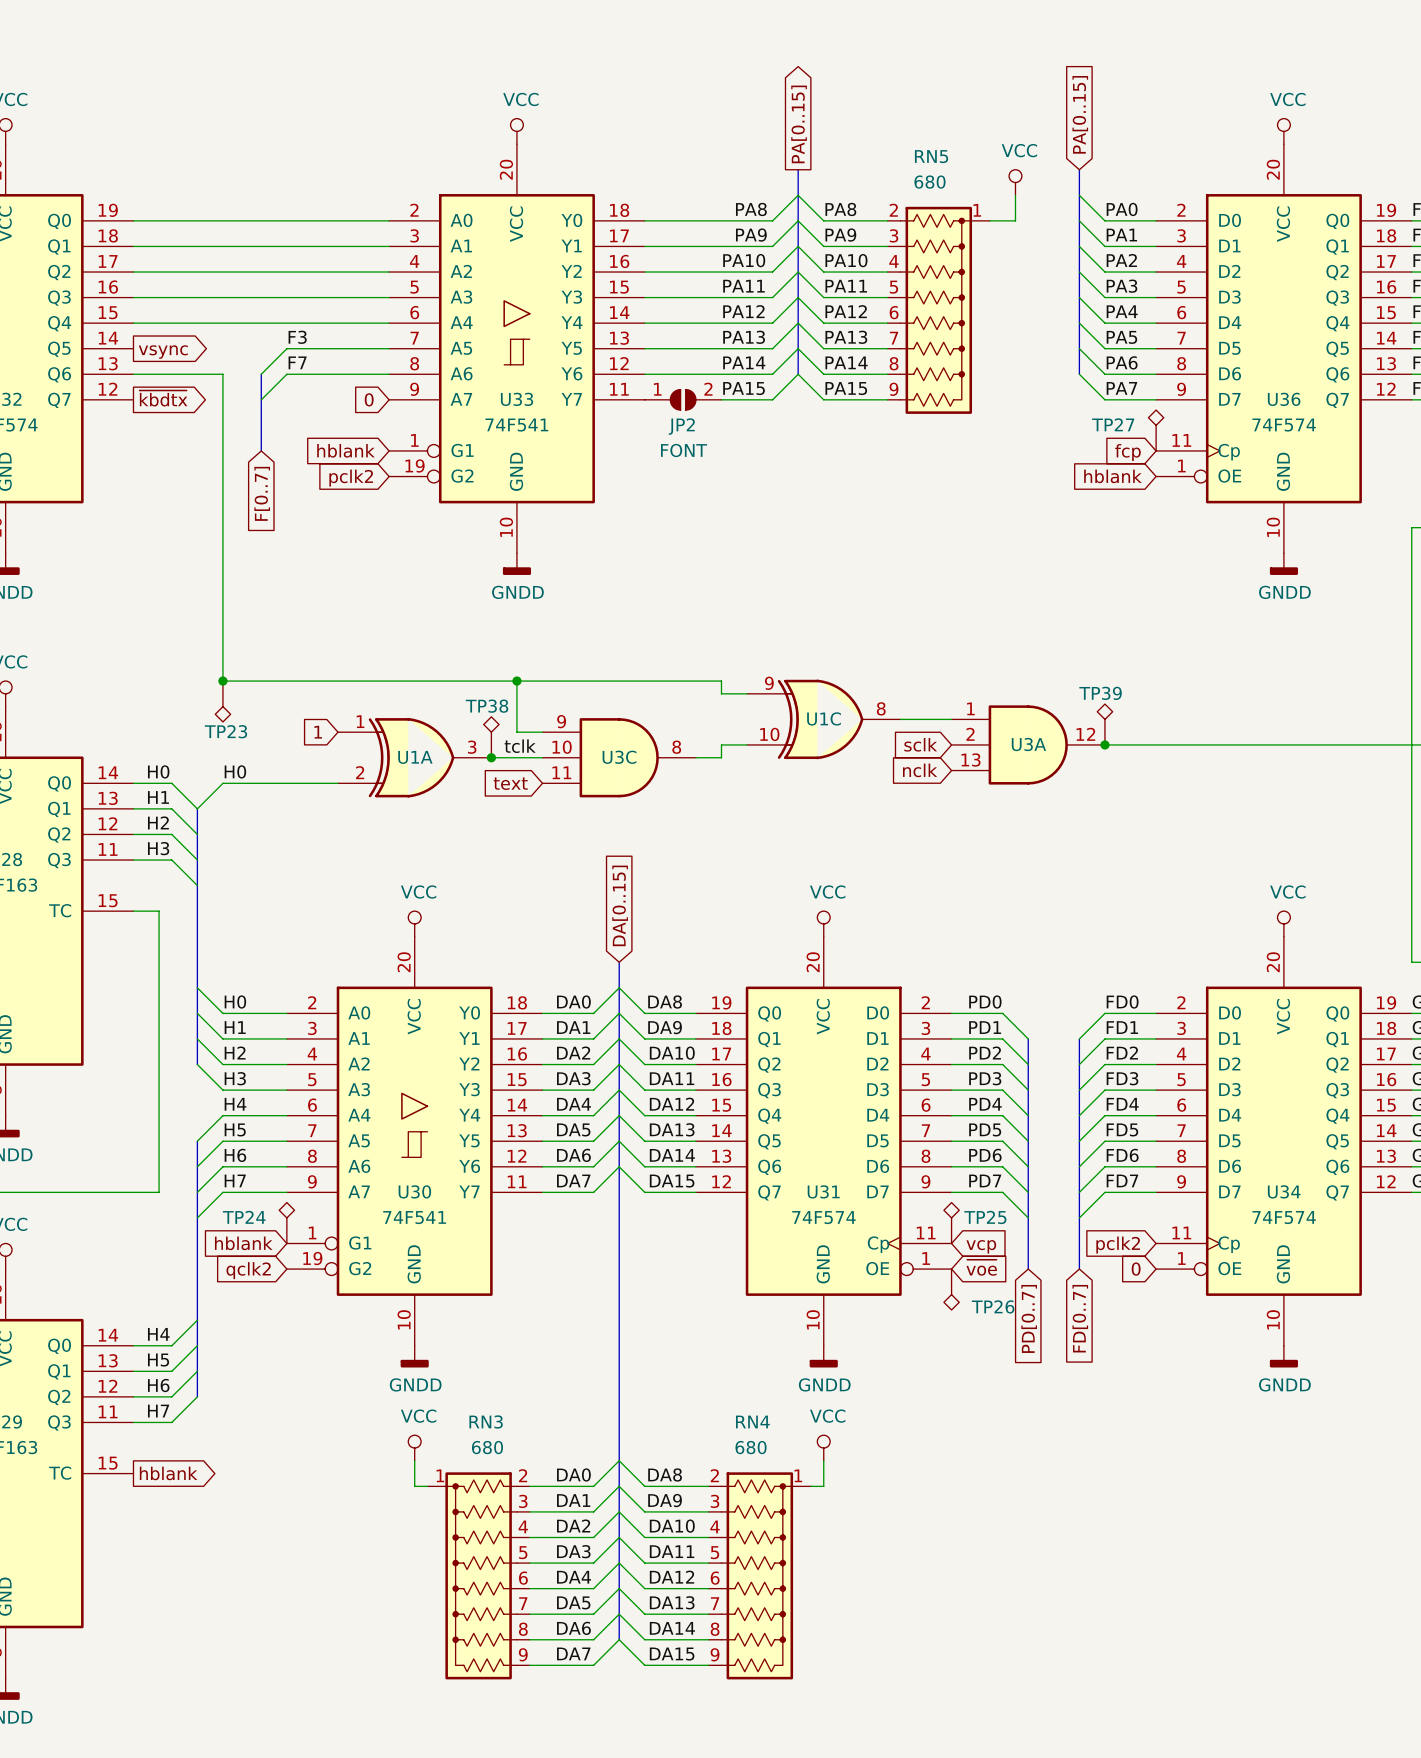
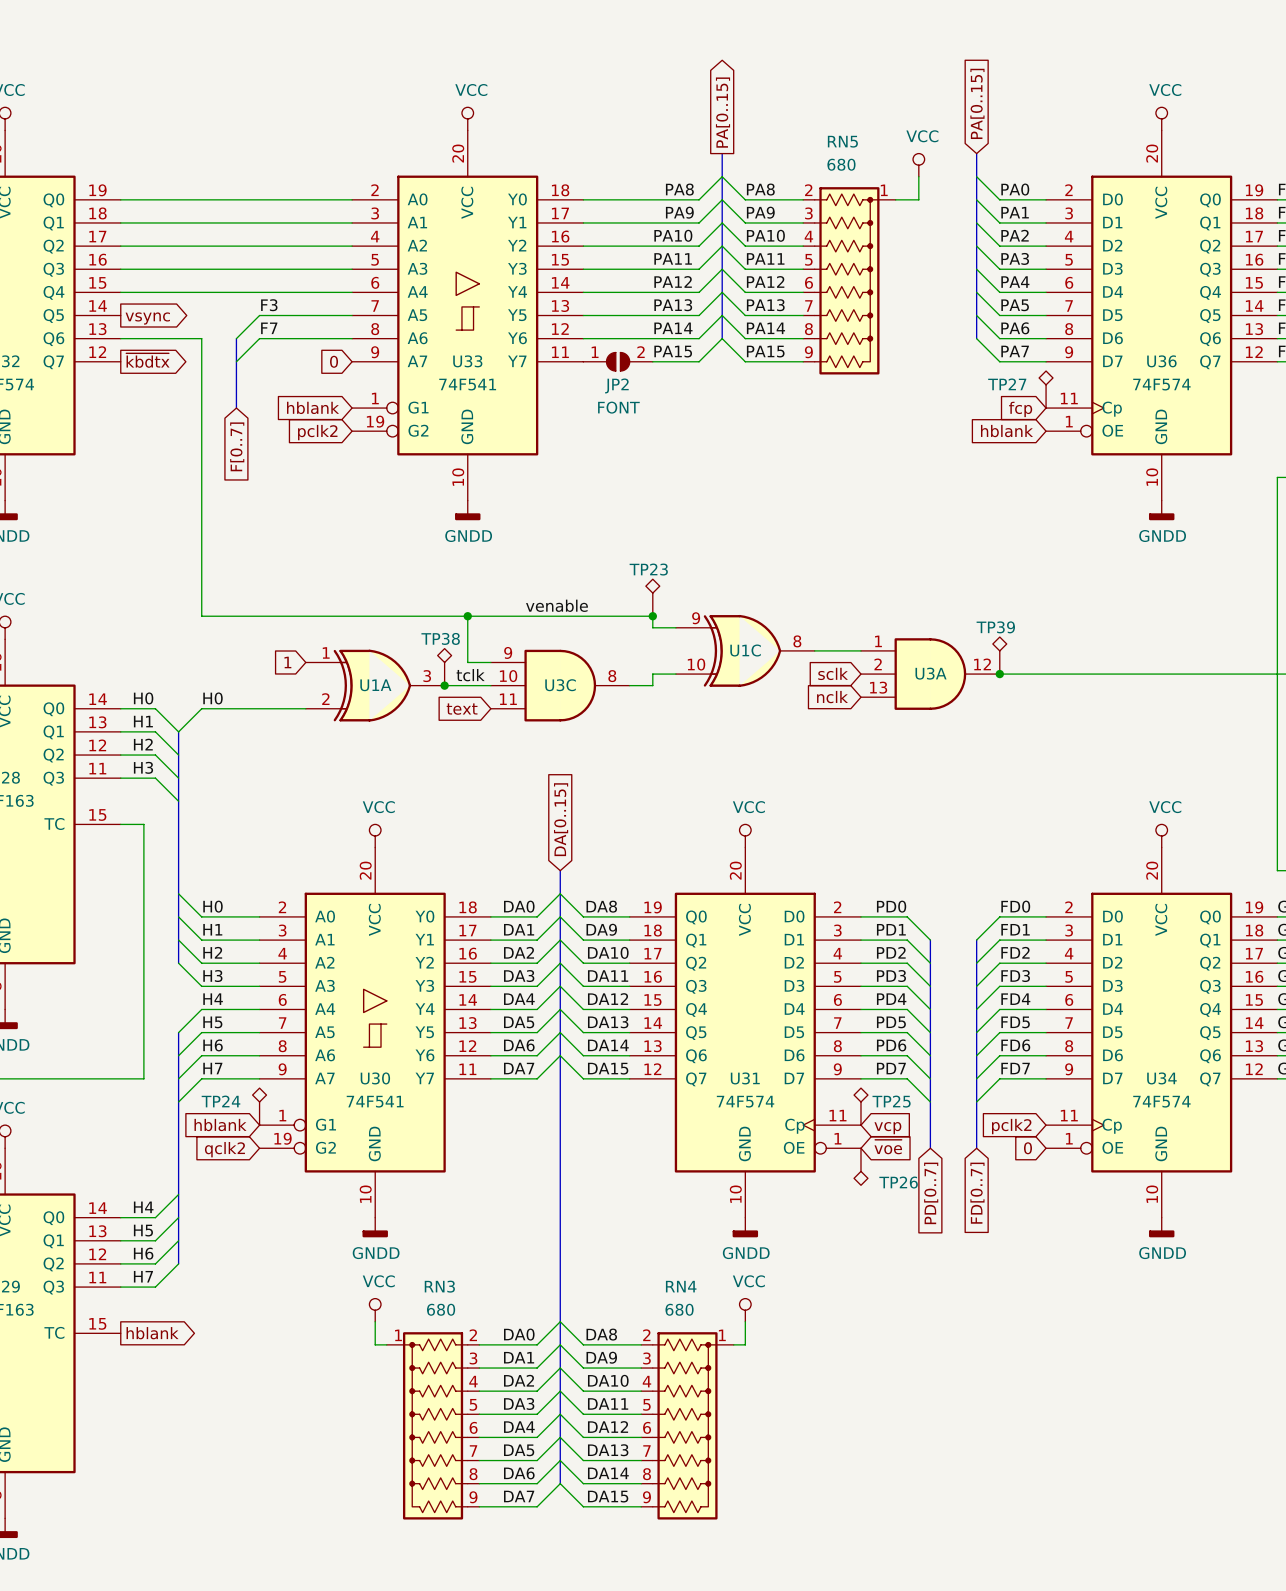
label: none -> venable (556, 605)
junction: (222, 681) -> none
junction: none -> (652, 616)
TP23 position: (222, 701) -> (652, 597)
TP23 rotation: 0° (222, 714) -> 180° (652, 586)

